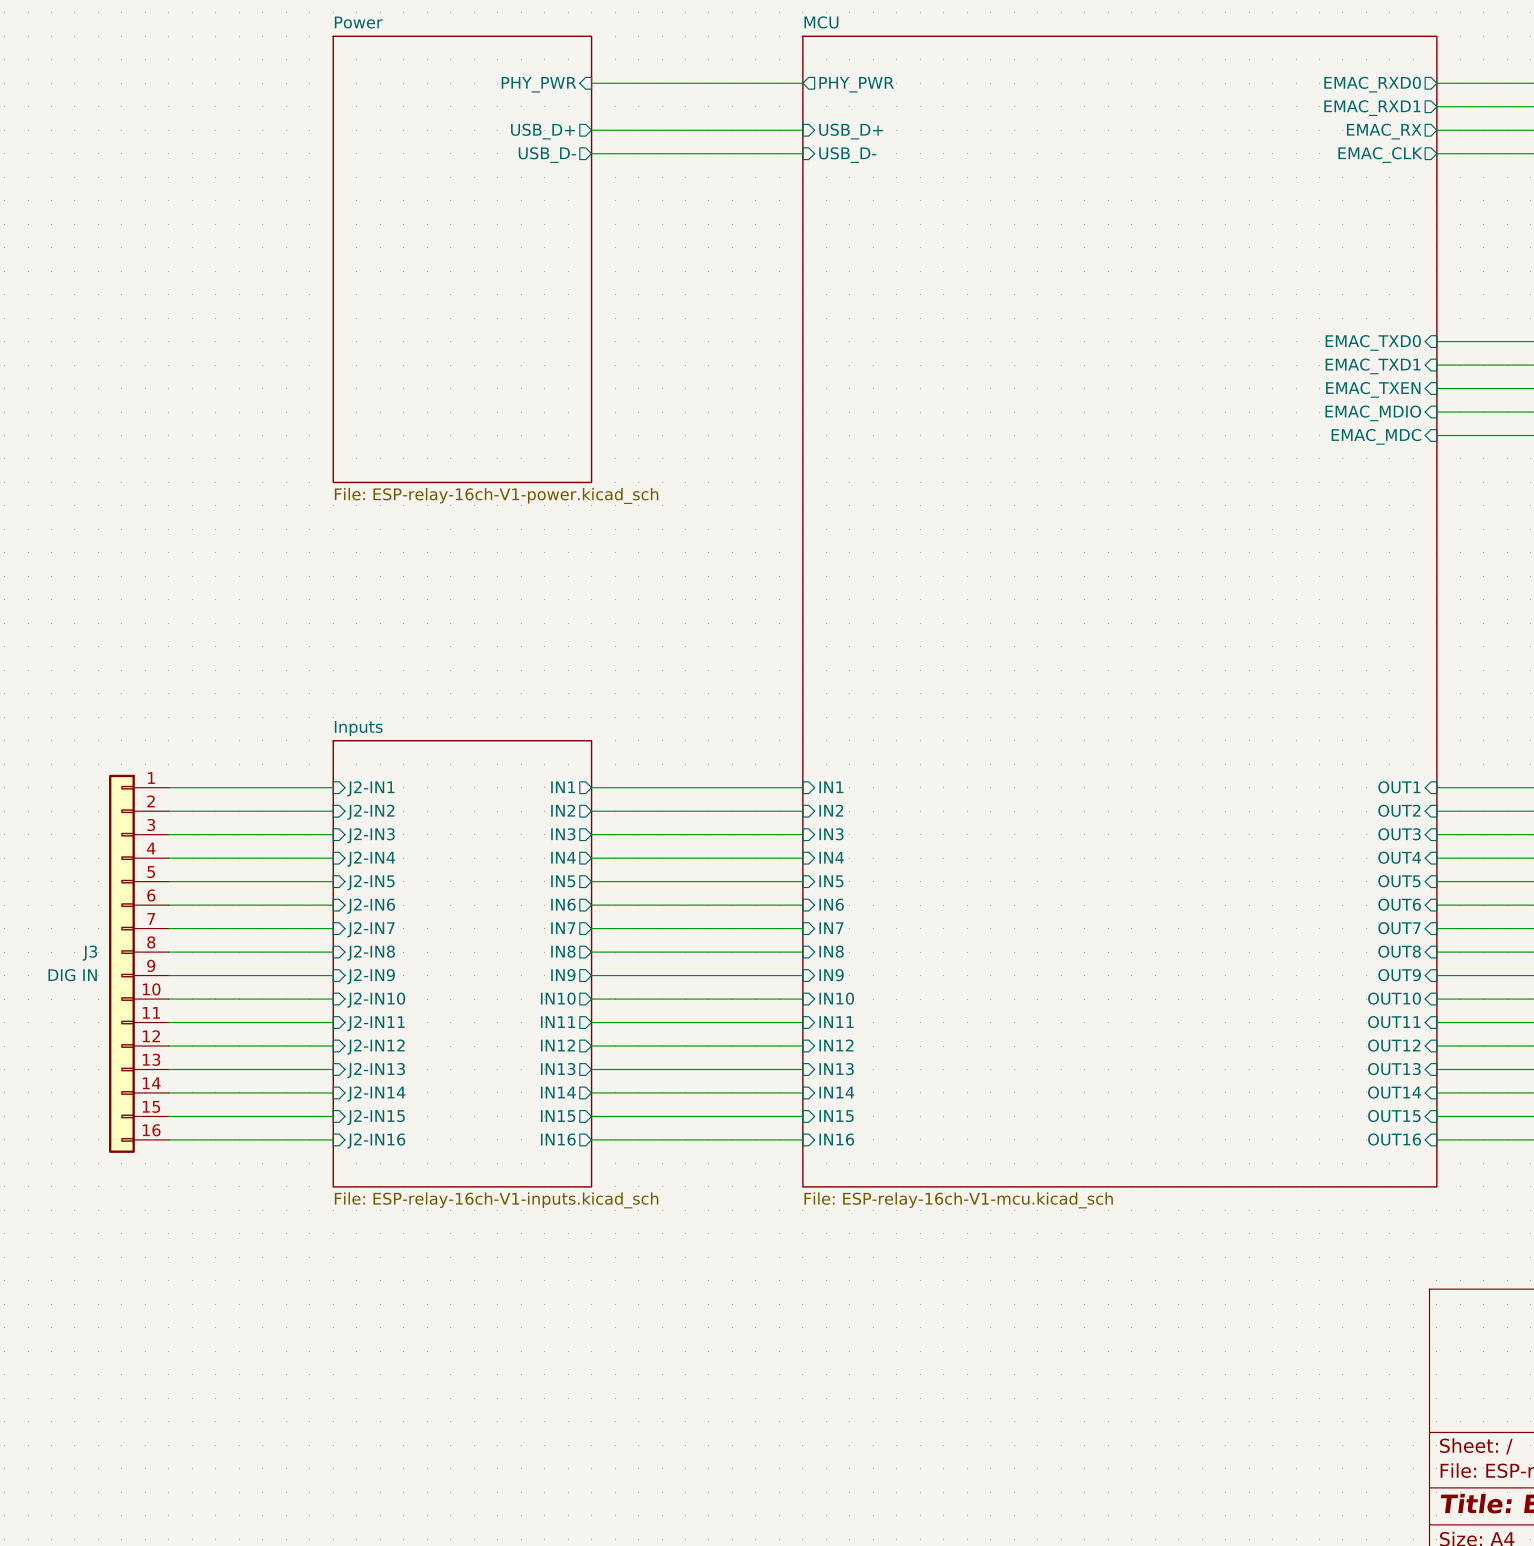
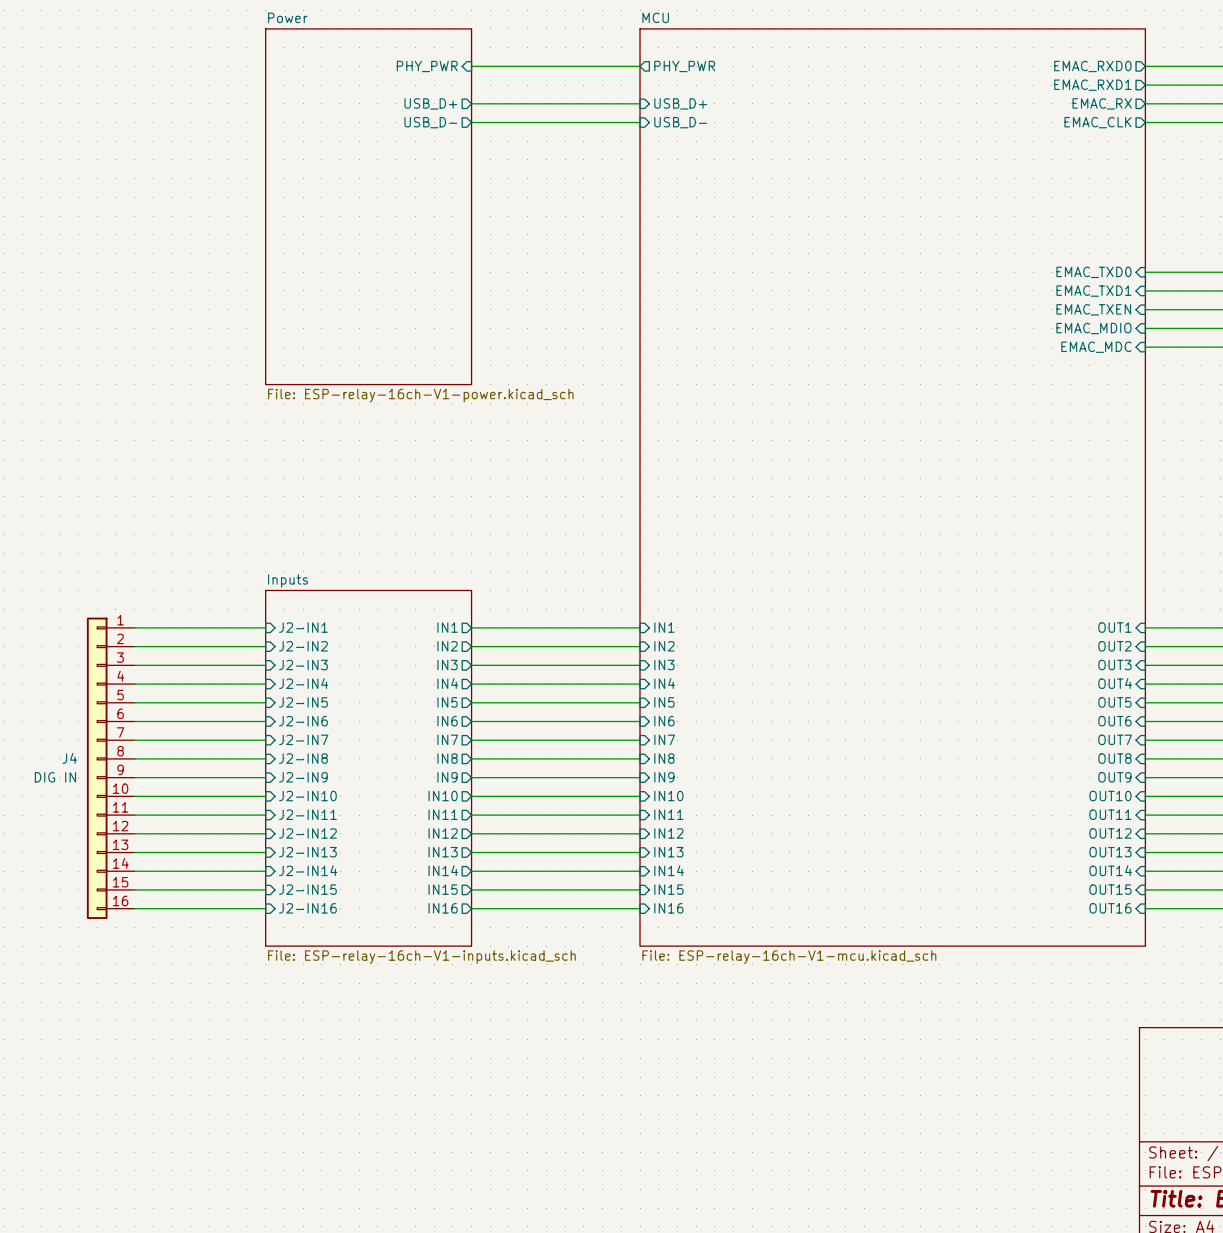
J3 name: J3 (89, 953) -> J4 (69, 758)

